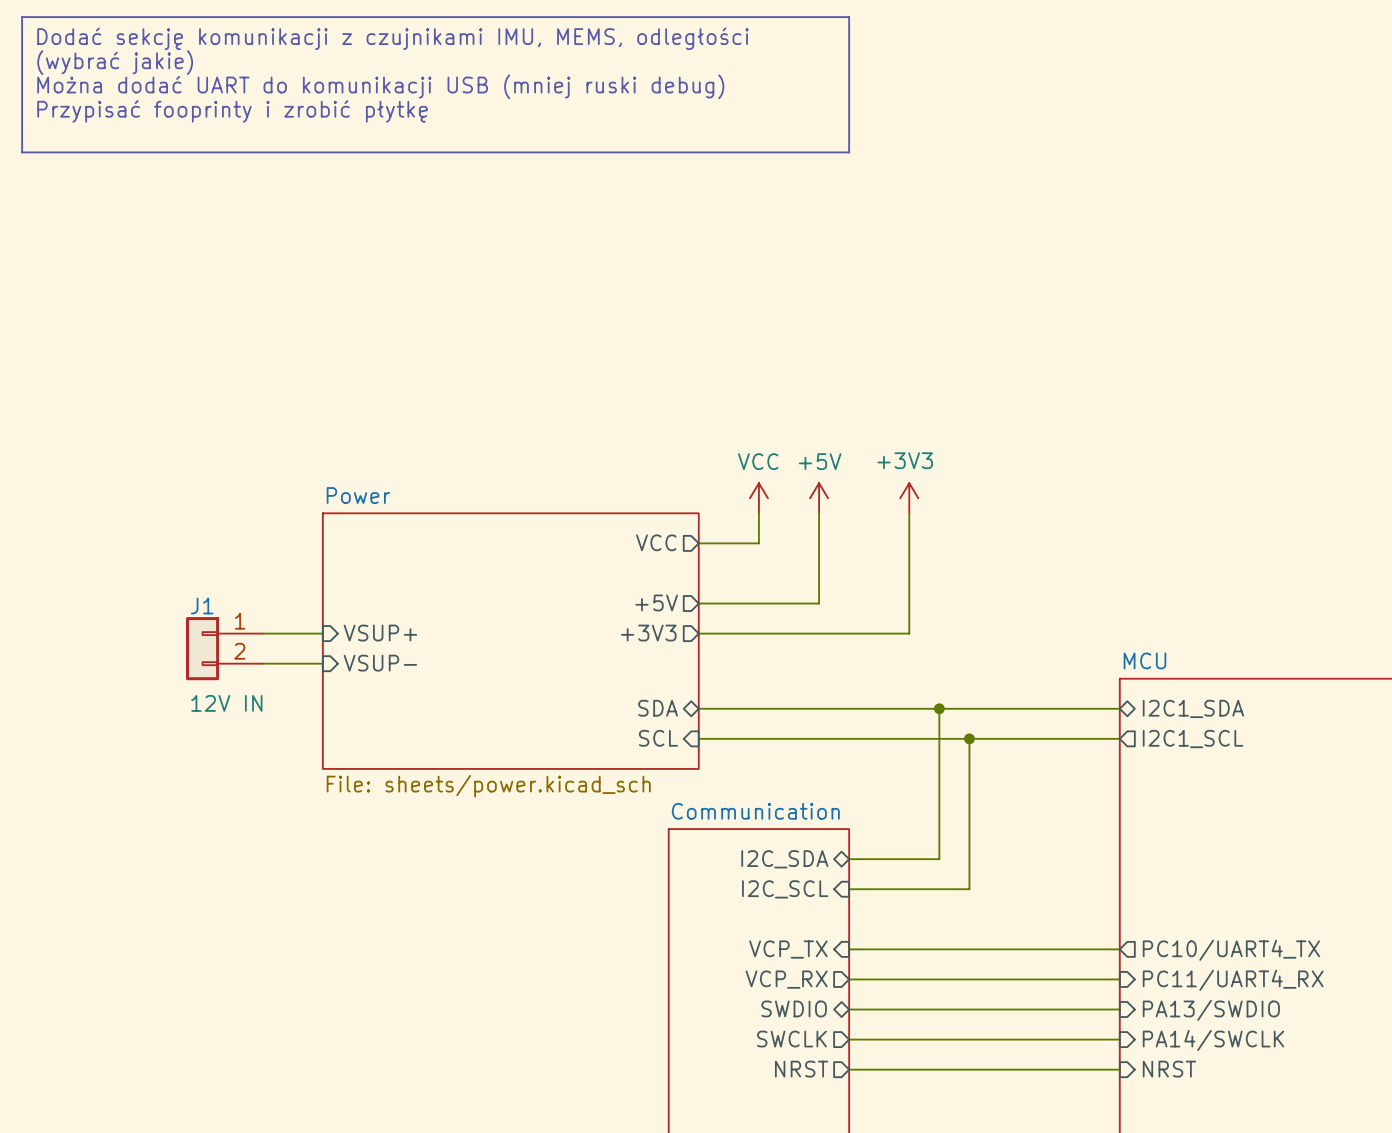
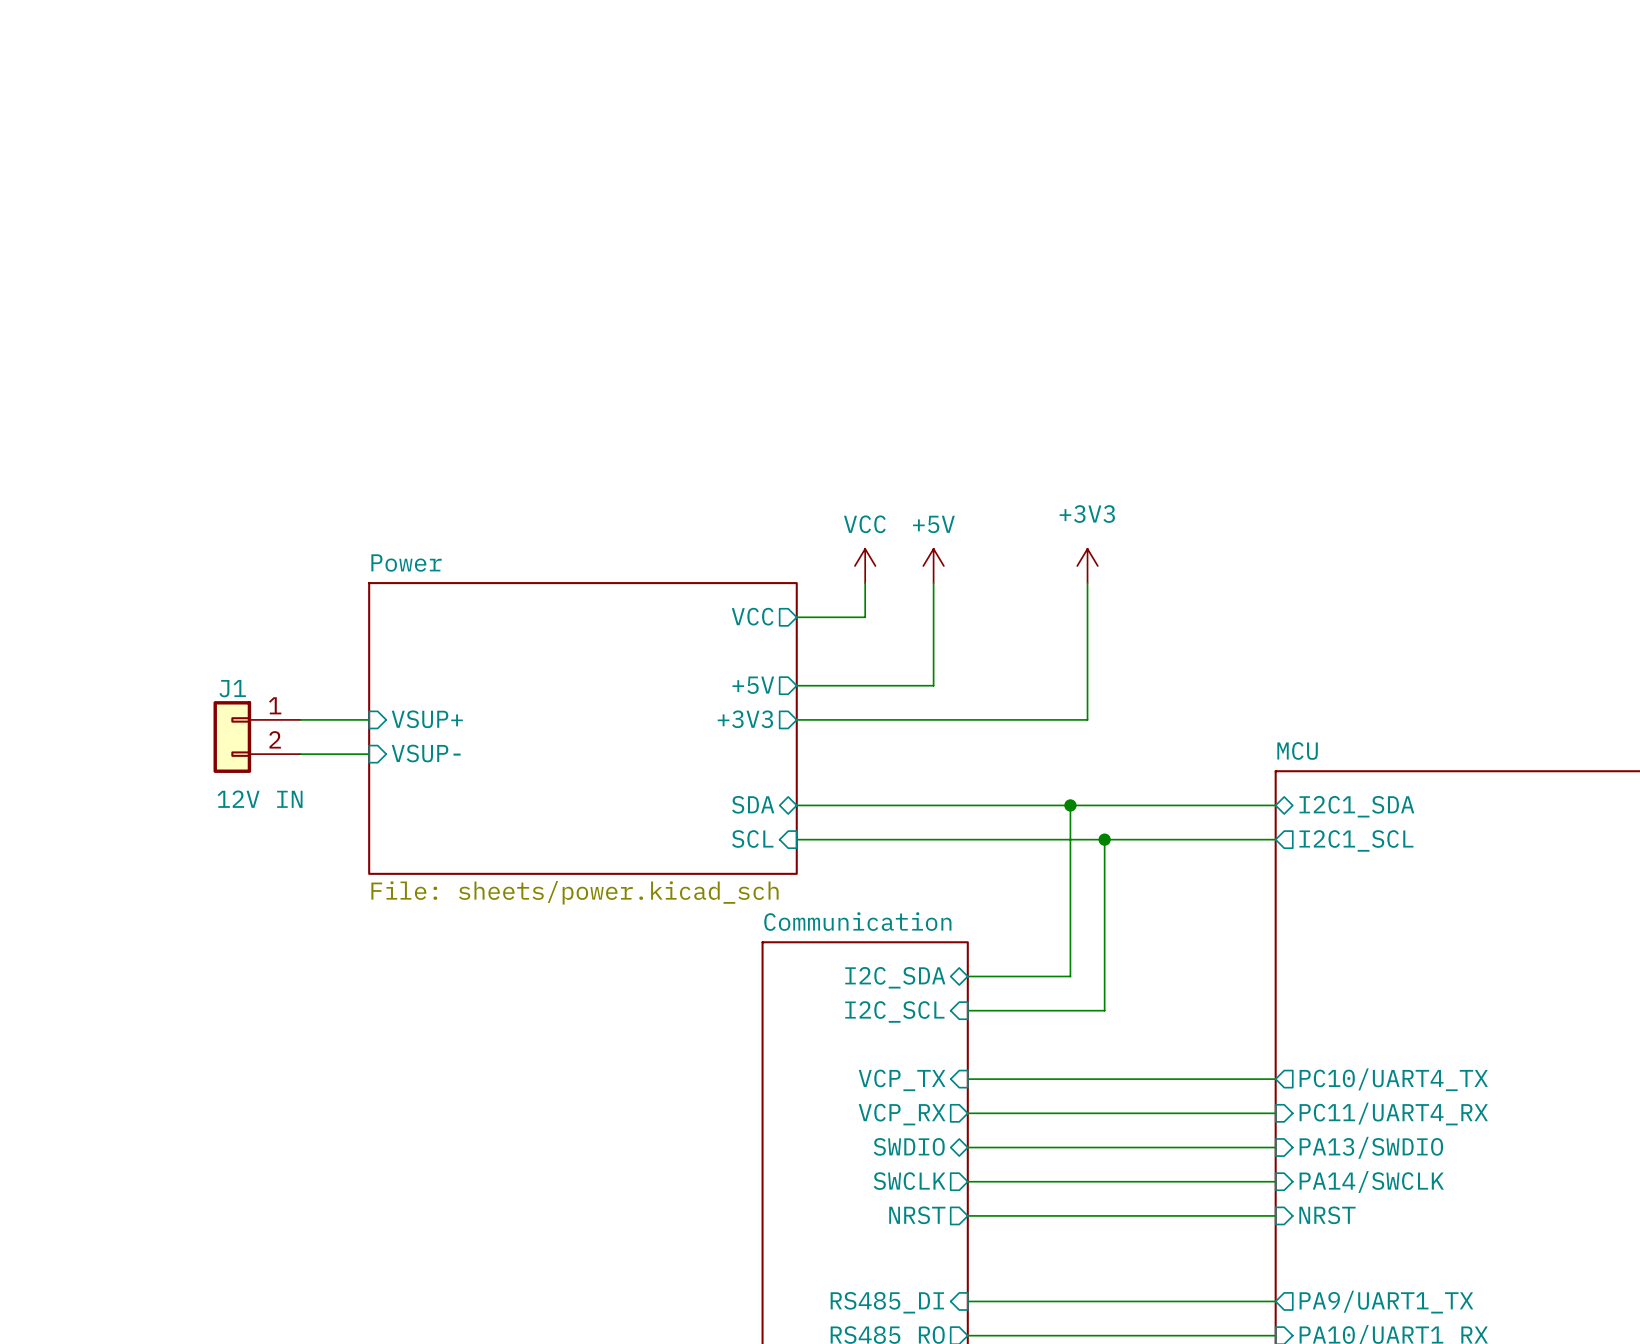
line: (22, 17) (849, 17) (849, 152) (22, 152) (22, 17) -> none
text: Dodać sekcję komunikacji z czujnikami IMU, MEMS, odległości (392, 38) -> none
text: (wybrać jakie) (115, 62) -> none
text: Można dodać UART do komunikacji USB (mniej ruski debug) (380, 86) -> none
text: Przypisać fooprinty i zrobić płytkę (232, 111) -> none
power symbol text position: +3V3 (905, 460) -> +3V3 (1087, 514)
power symbol position: +3V3 (909, 498) -> +3V3 (1087, 565)
wire: (909, 513) (909, 633) -> (1087, 583) (1087, 719) (1036, 719)

